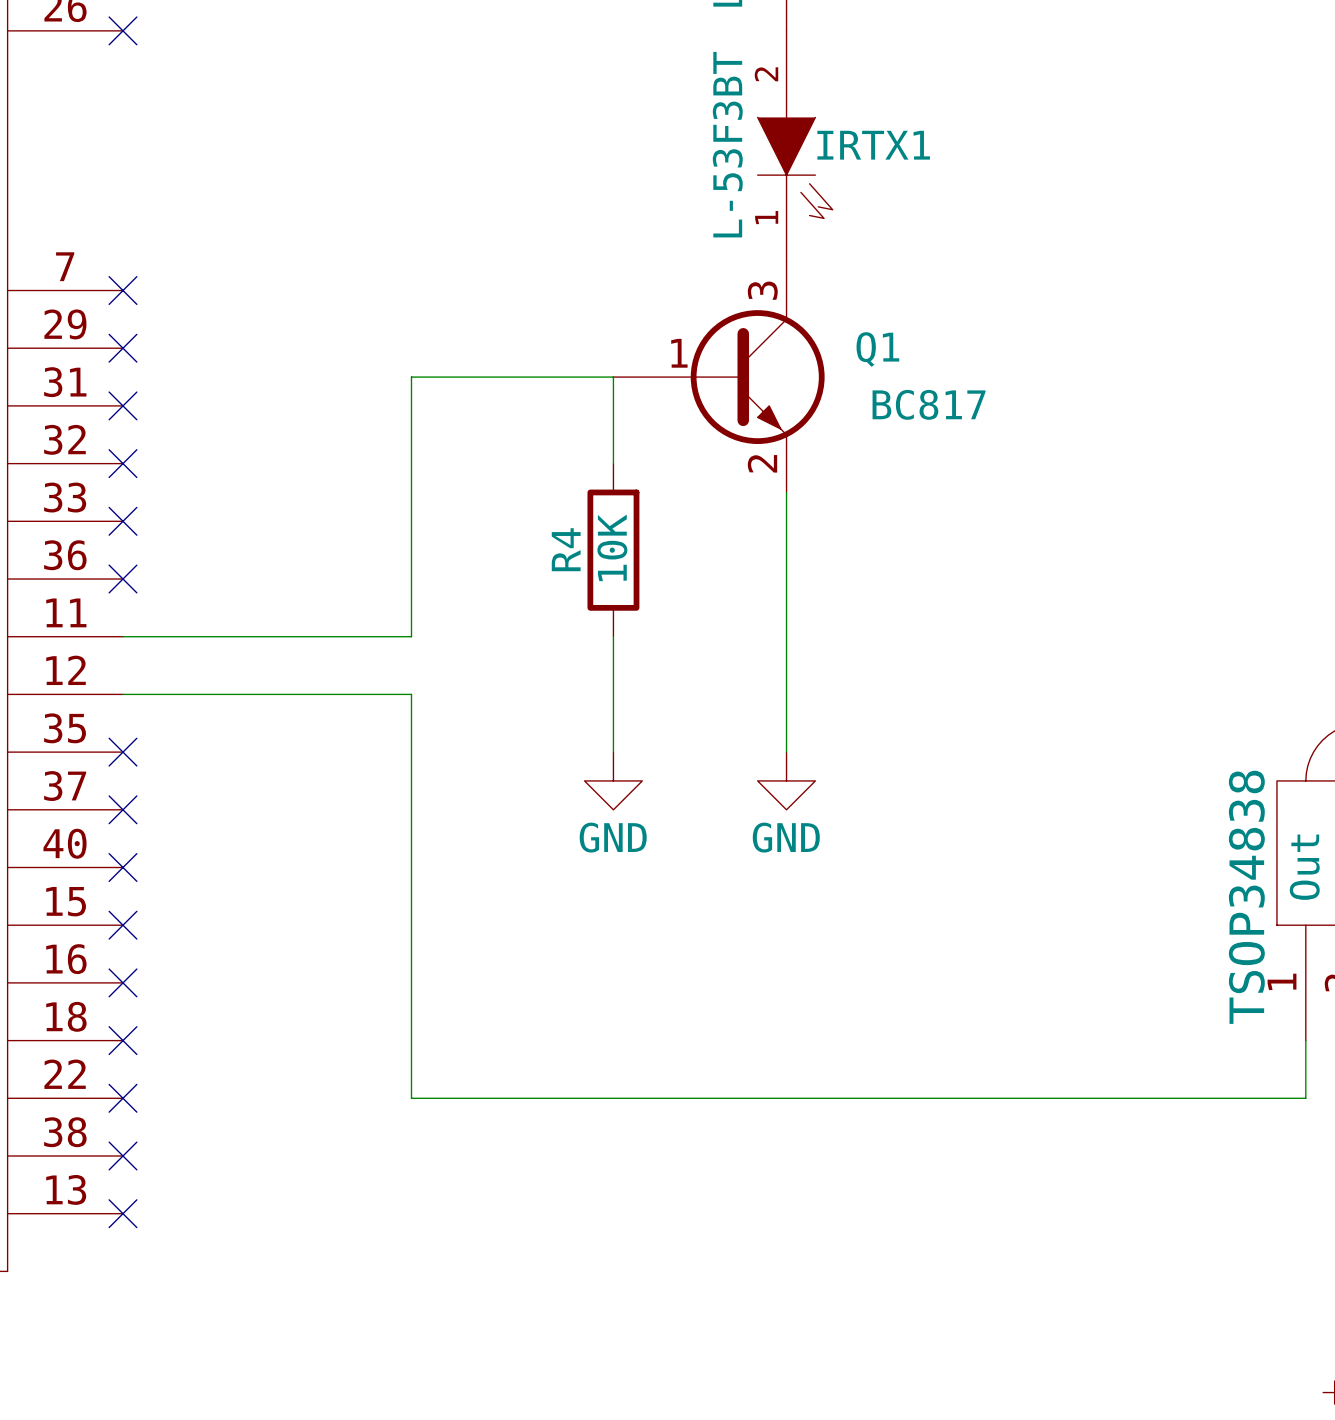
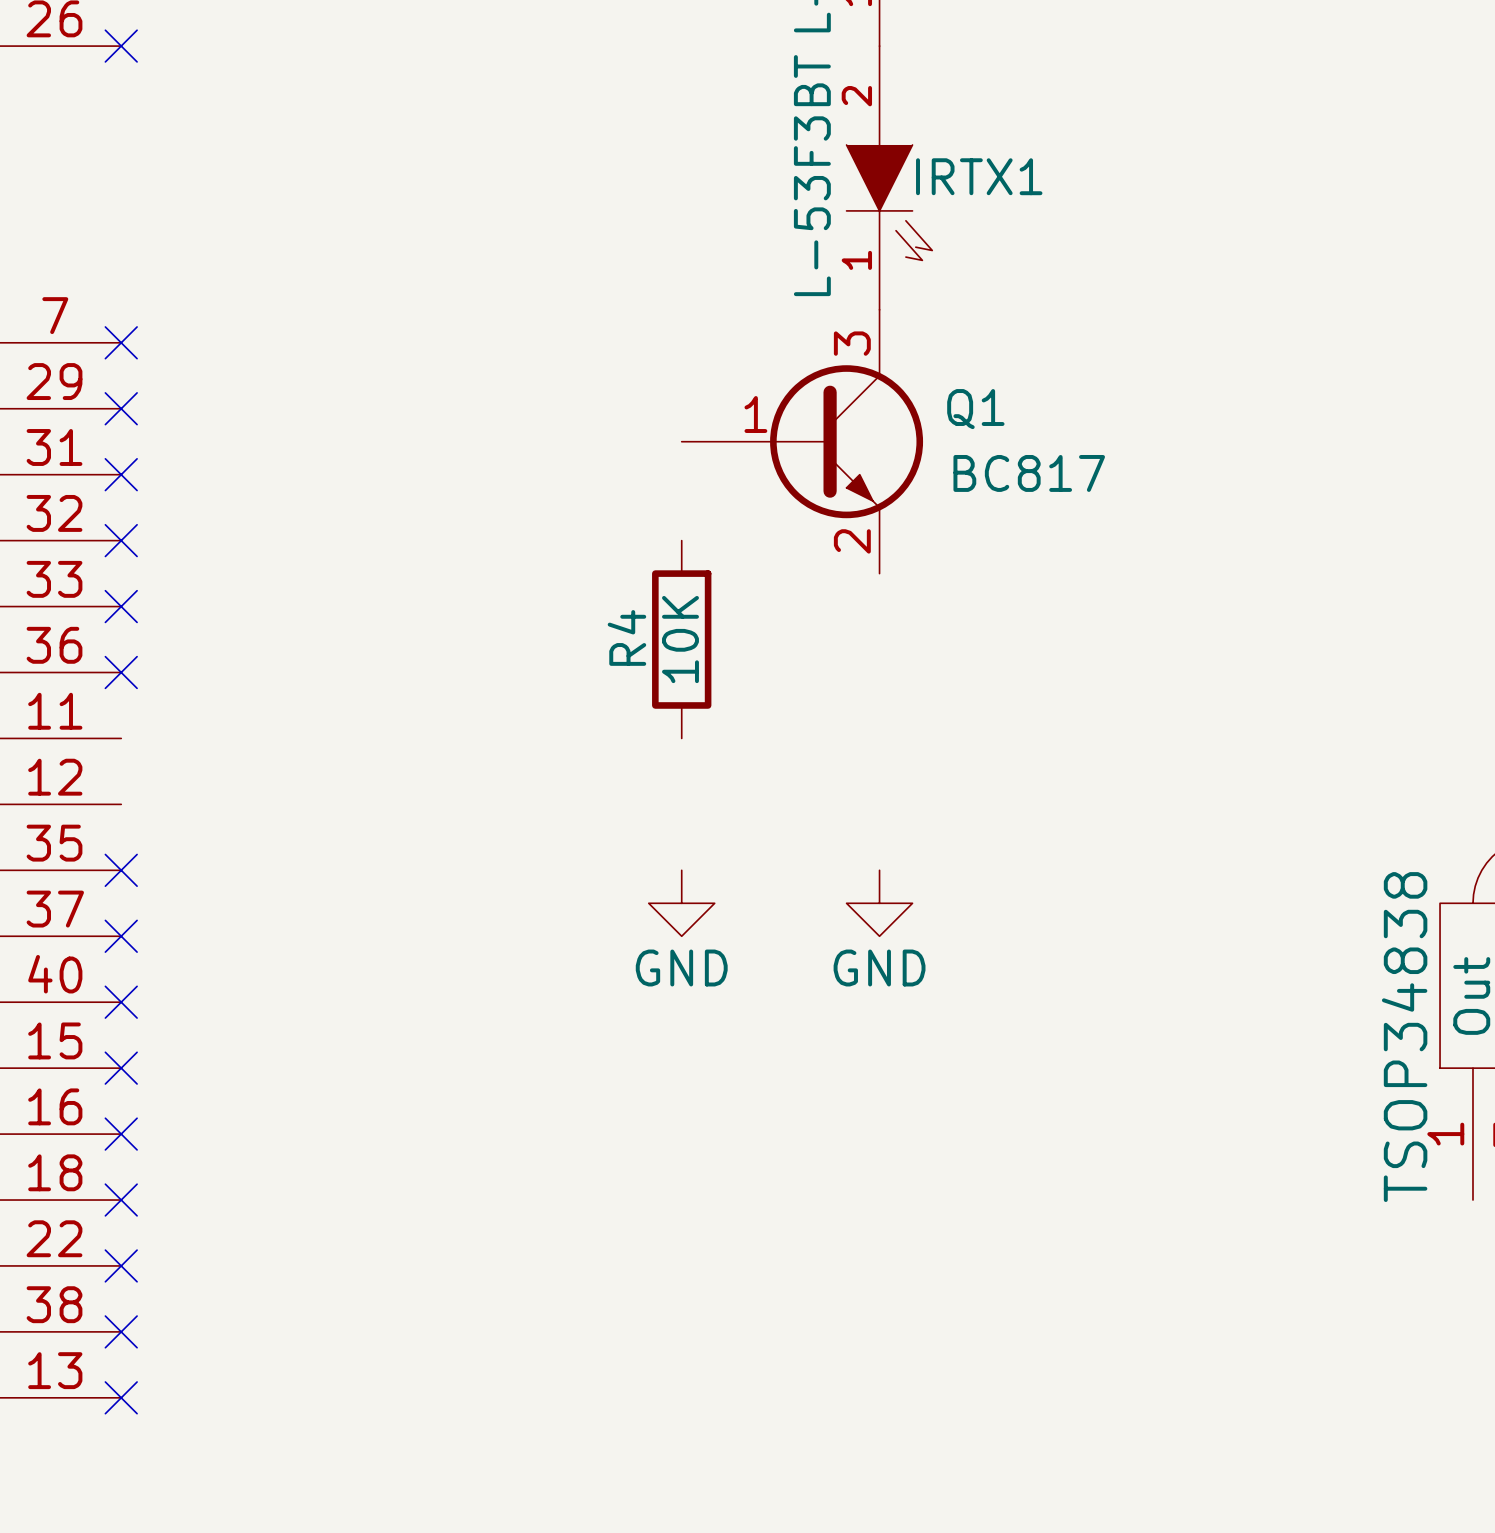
wire: (613, 463) (613, 377) (411, 377) (411, 636) (123, 636) -> none
wire: (786, 492) (786, 752) -> none
wire: (613, 636) (613, 752) -> none
wire: (123, 694) (411, 694) (411, 1098) (1305, 1098) (1305, 1040) -> none

